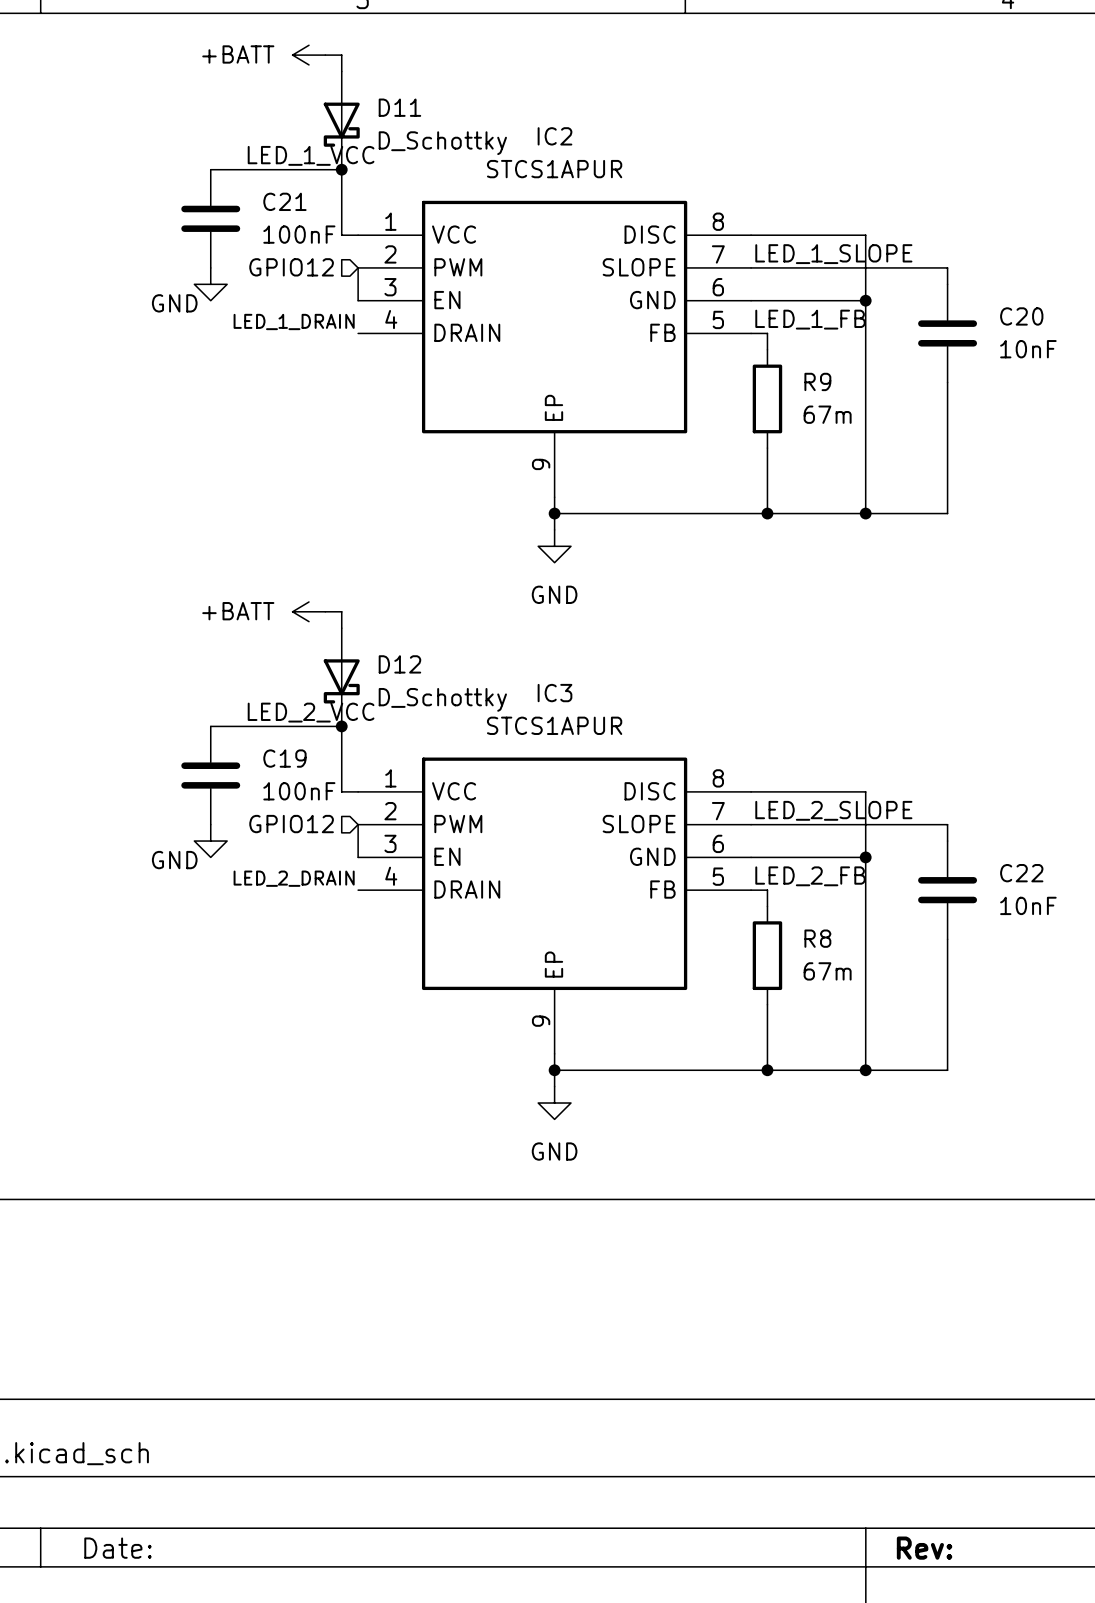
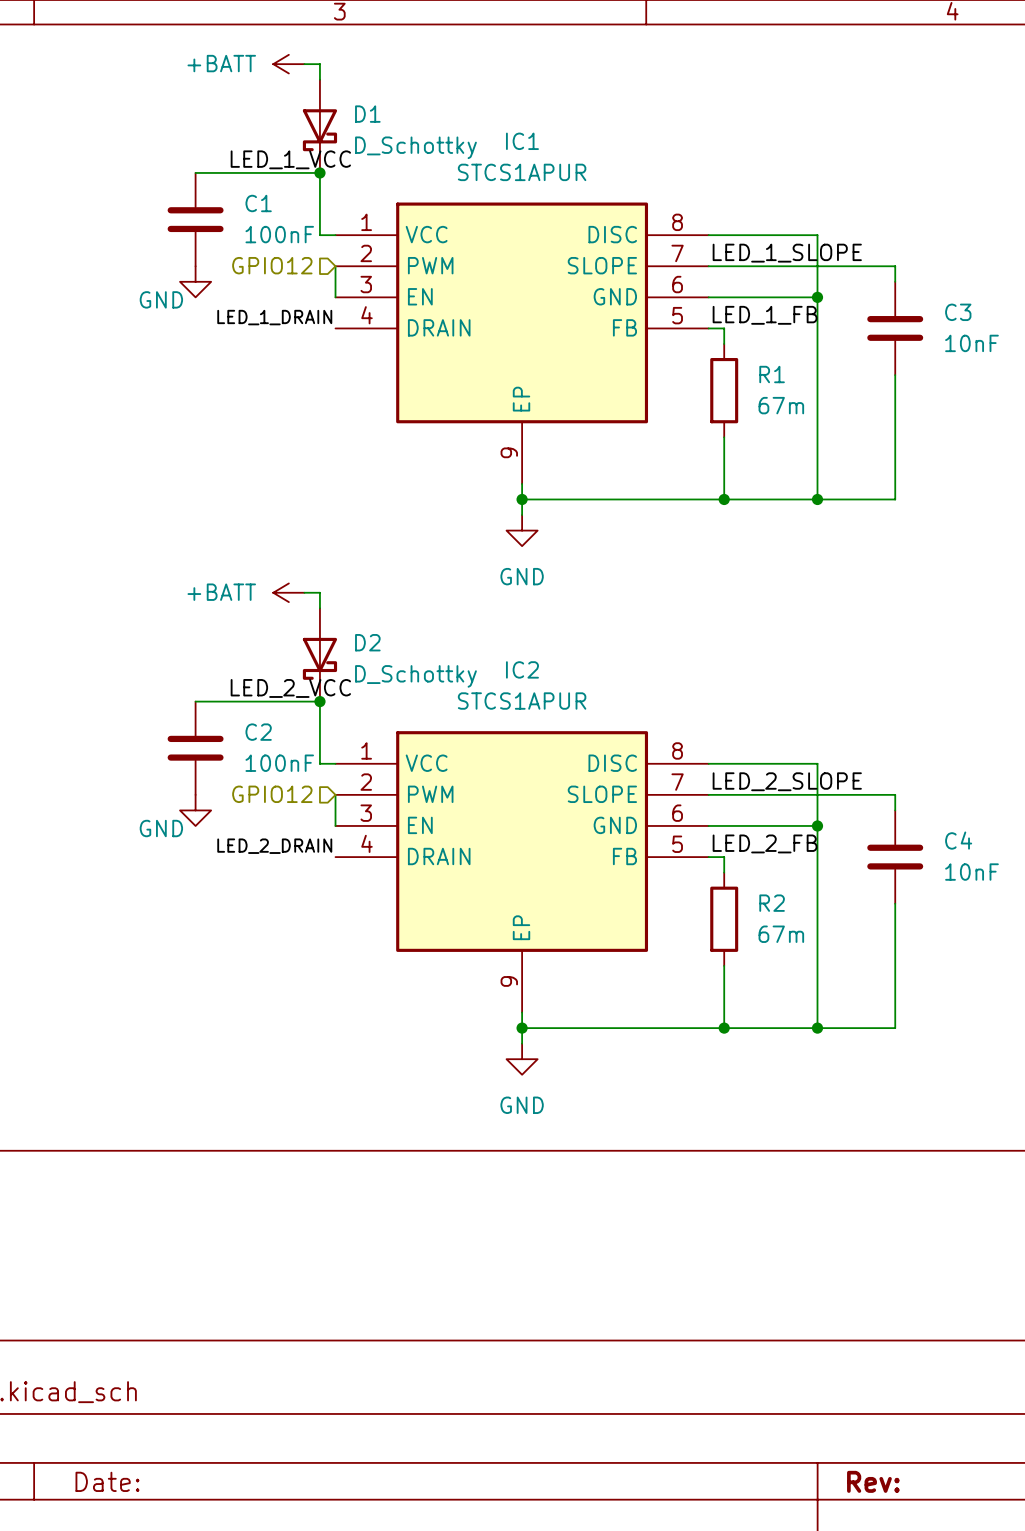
D11 name: D11 (399, 107) -> D1 (367, 114)
IC2 name: IC2 (554, 136) -> IC1 (522, 141)
C21 name: C21 (284, 201) -> C1 (258, 203)
C20 name: C20 (1021, 316) -> C3 (958, 312)
R9 name: R9 (817, 381) -> R1 (772, 374)
D12 name: D12 (399, 664) -> D2 (367, 642)
IC3 name: IC3 (554, 693) -> IC2 (522, 669)
C19 name: C19 (284, 758) -> C2 (258, 732)
C22 name: C22 (1021, 873) -> C4 (958, 840)
R8 name: R8 (817, 938) -> R2 (772, 903)

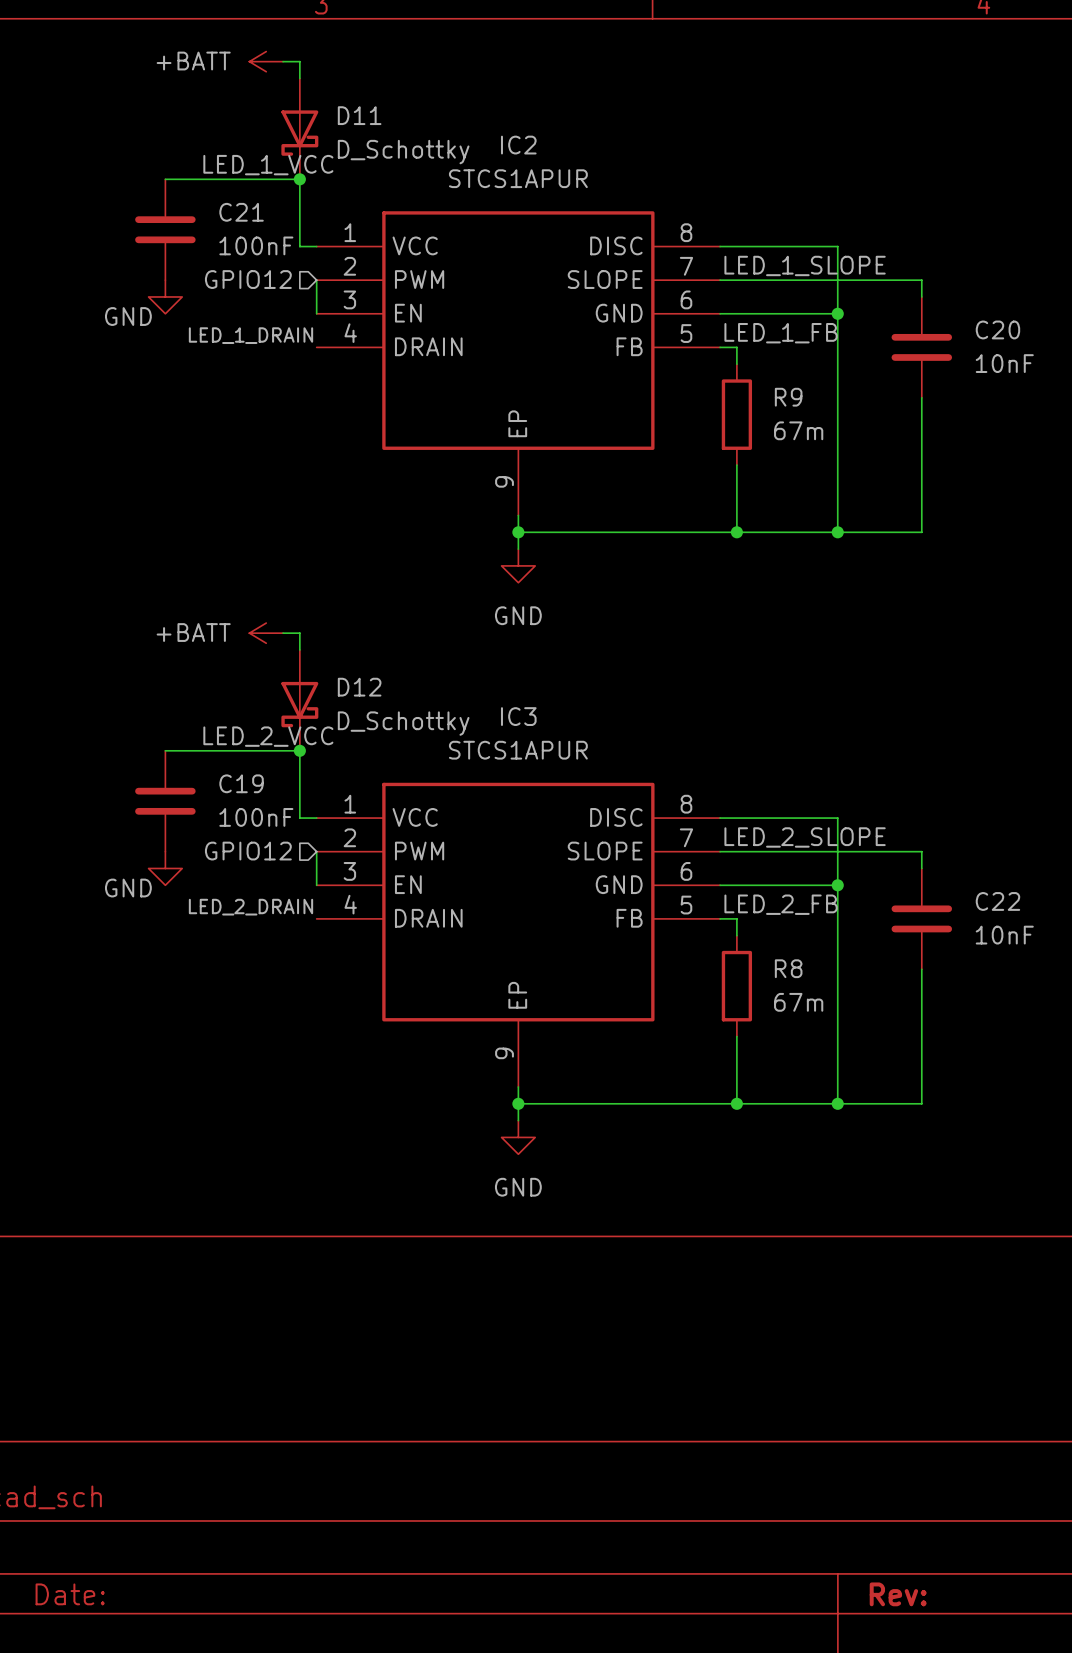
D1 name: D1 (367, 114) -> D11 (359, 115)
IC1 name: IC1 (522, 141) -> IC2 (518, 145)
C1 name: C1 (258, 203) -> C21 (241, 212)
C3 name: C3 (958, 312) -> C20 (997, 329)
R1 name: R1 (772, 374) -> R9 (788, 397)
D2 name: D2 (367, 642) -> D12 (359, 687)
IC2 name: IC2 (522, 669) -> IC3 (518, 716)
C2 name: C2 (258, 732) -> C19 (241, 783)
C4 name: C4 (958, 840) -> C22 (997, 901)
R2 name: R2 (772, 903) -> R8 (788, 968)

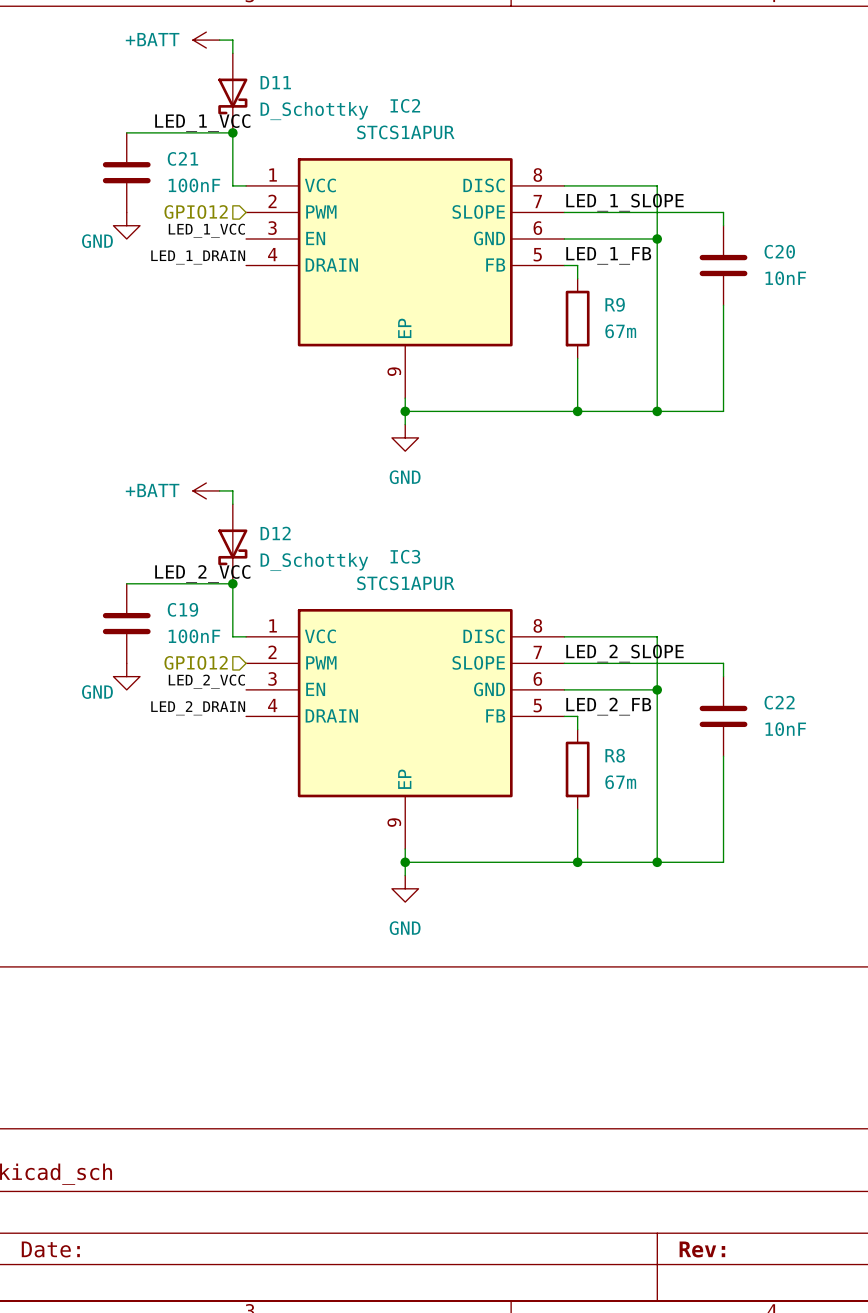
wire: (316, 280) (316, 313) -> none
label: none -> LED_1_VCC (206, 230)
wire: (316, 851) (316, 885) -> none
label: none -> LED_2_VCC (206, 681)

